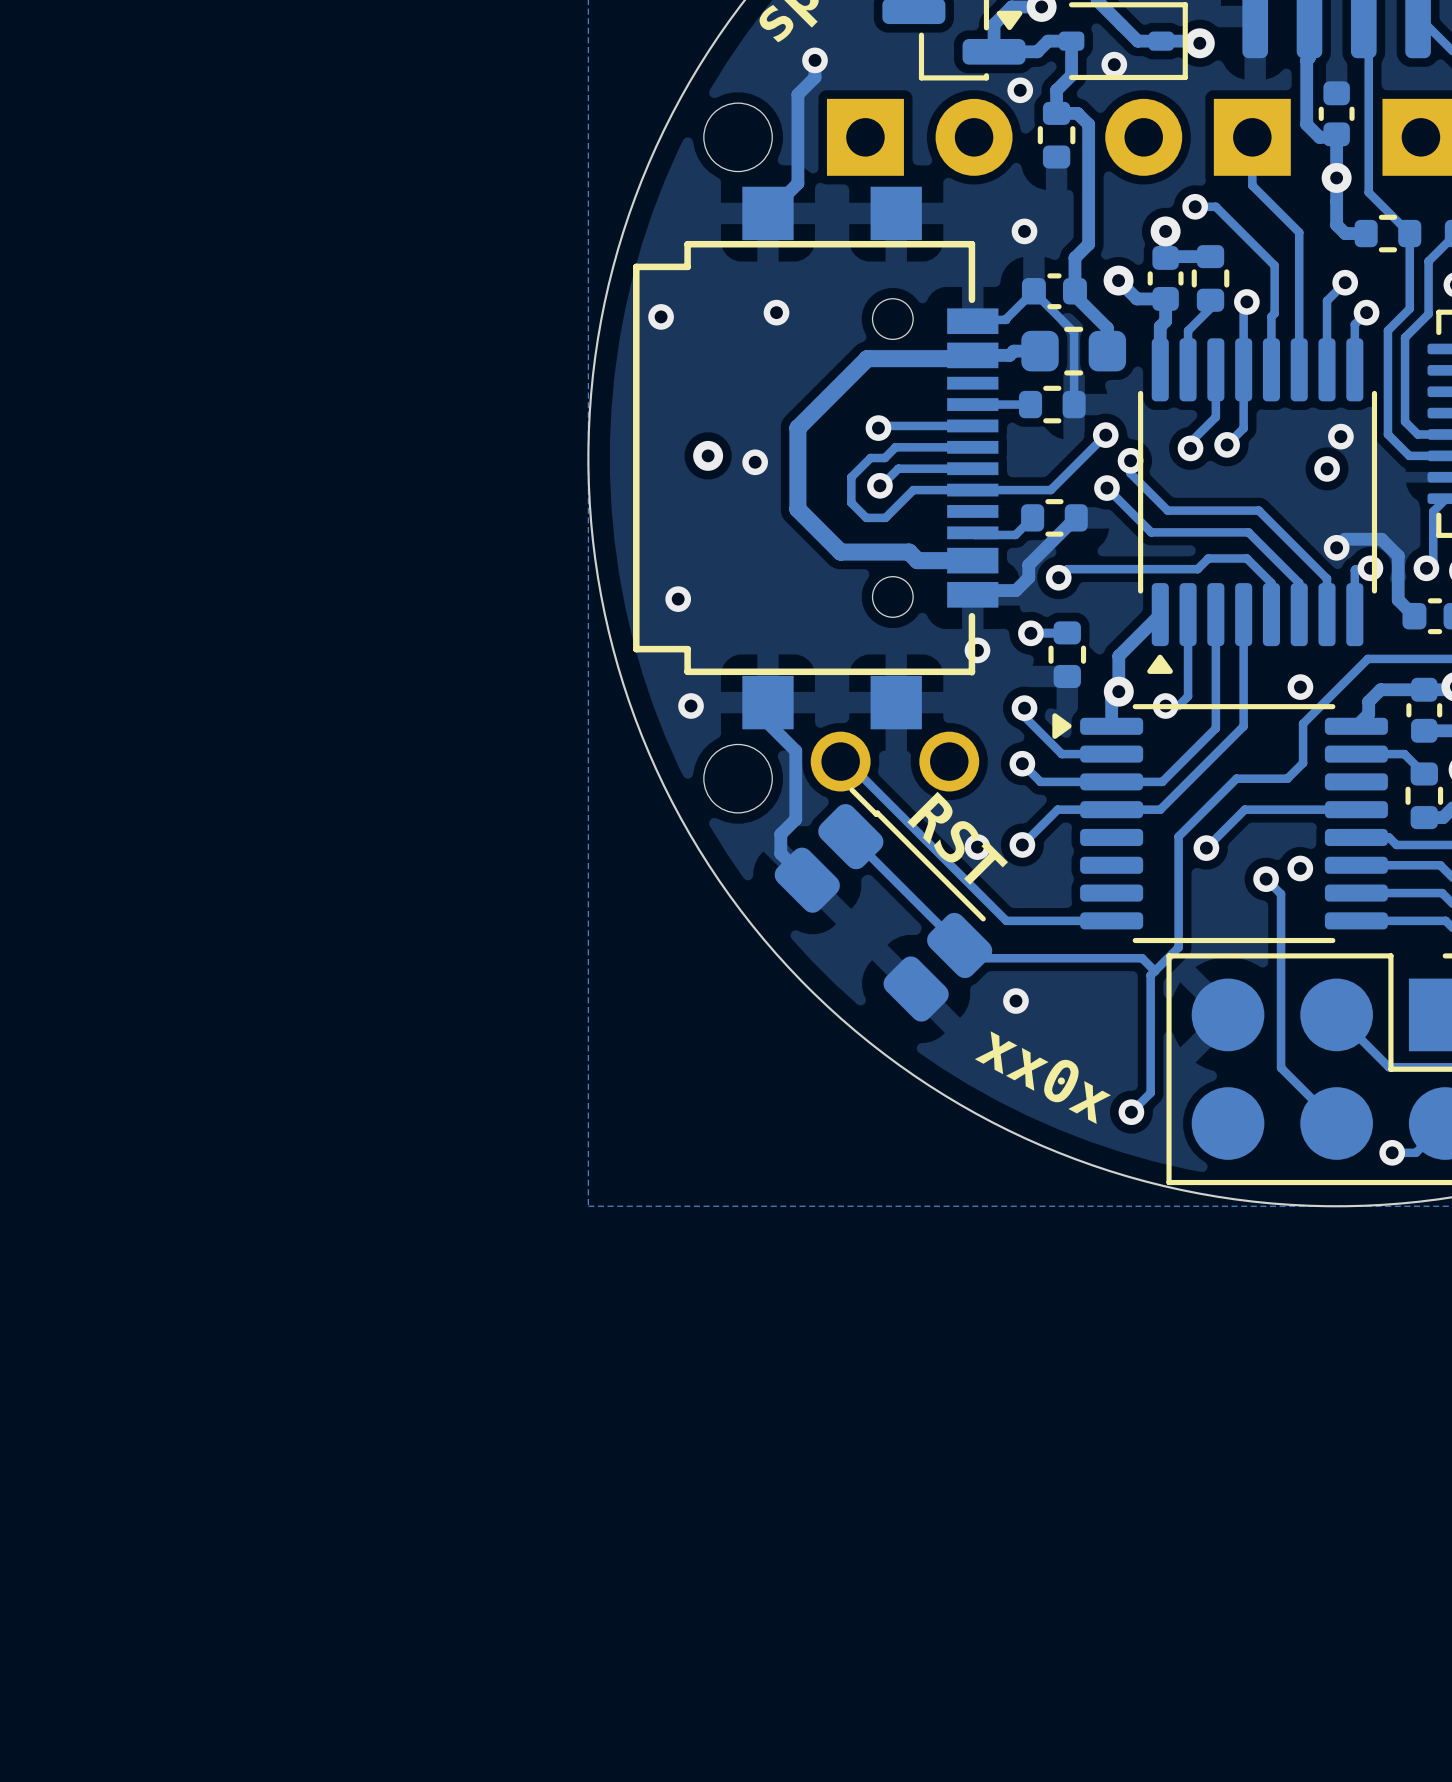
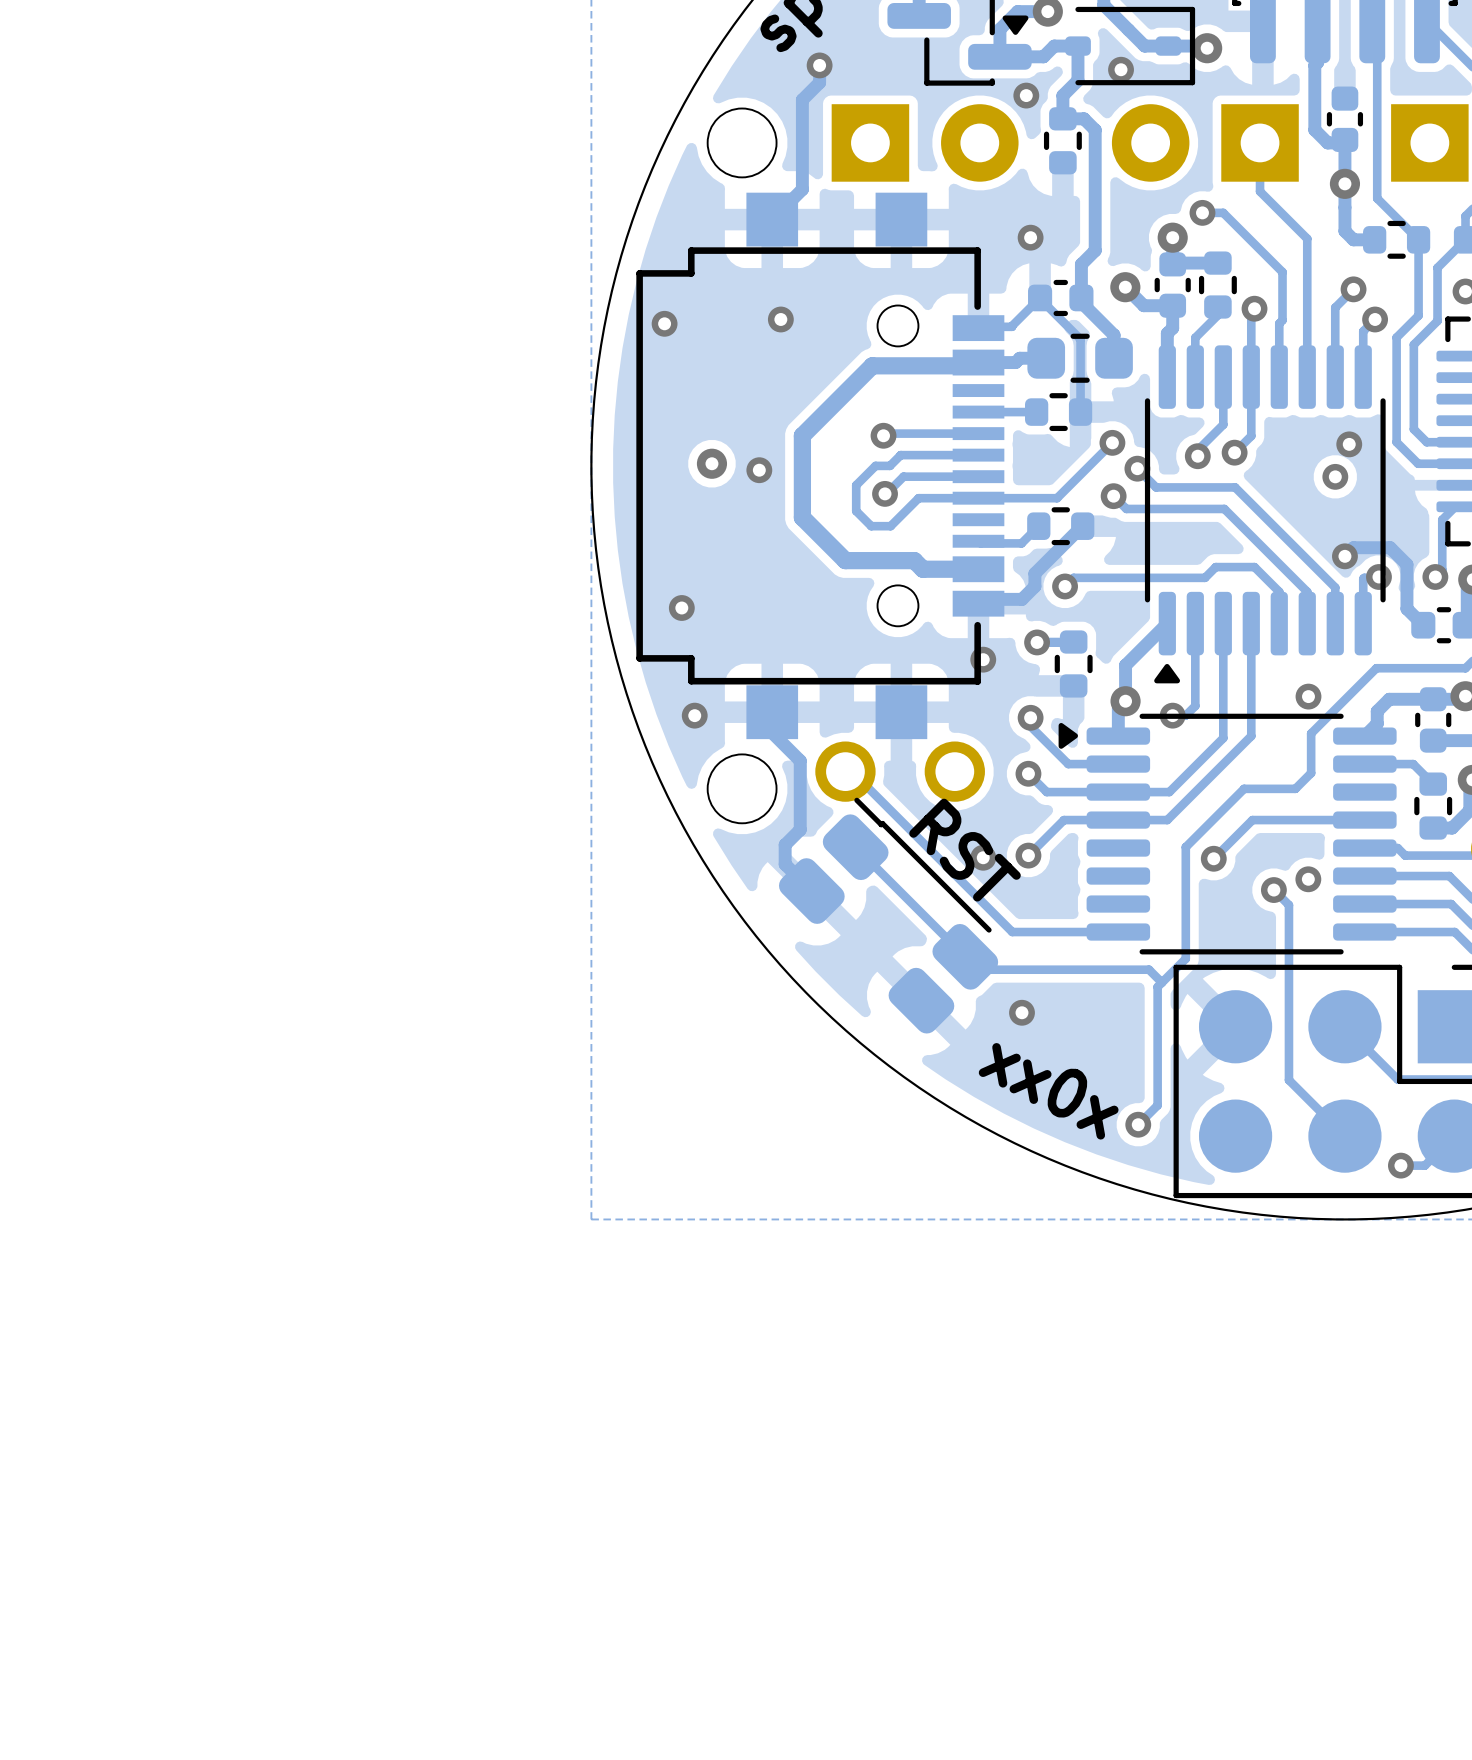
track: (1130, 460) (1130, 473) (1167, 510) (1258, 510) -> (1137, 468) (1156, 487) (1235, 487) (1266, 518)
track: (1119, 500) (1151, 532) (1248, 532) -> (1126, 508) (1224, 508) (1256, 540)

